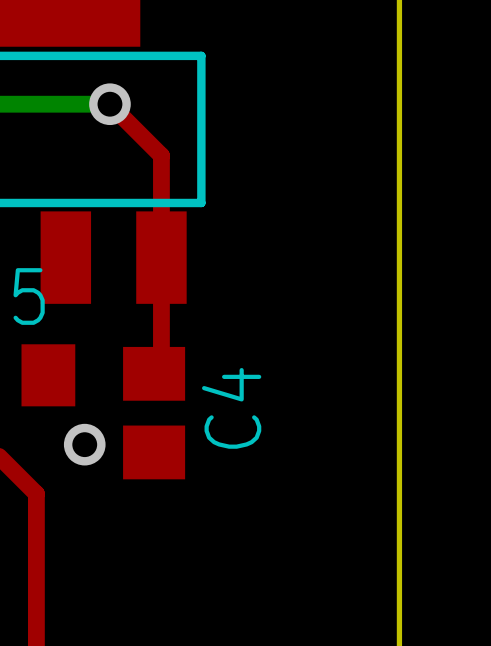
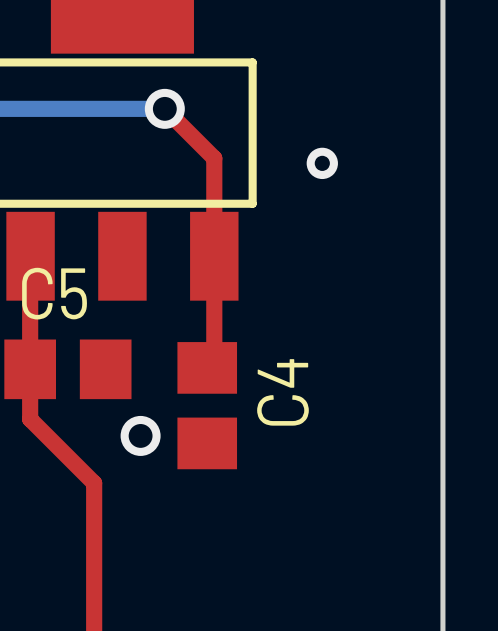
via: none -> (322, 163)

